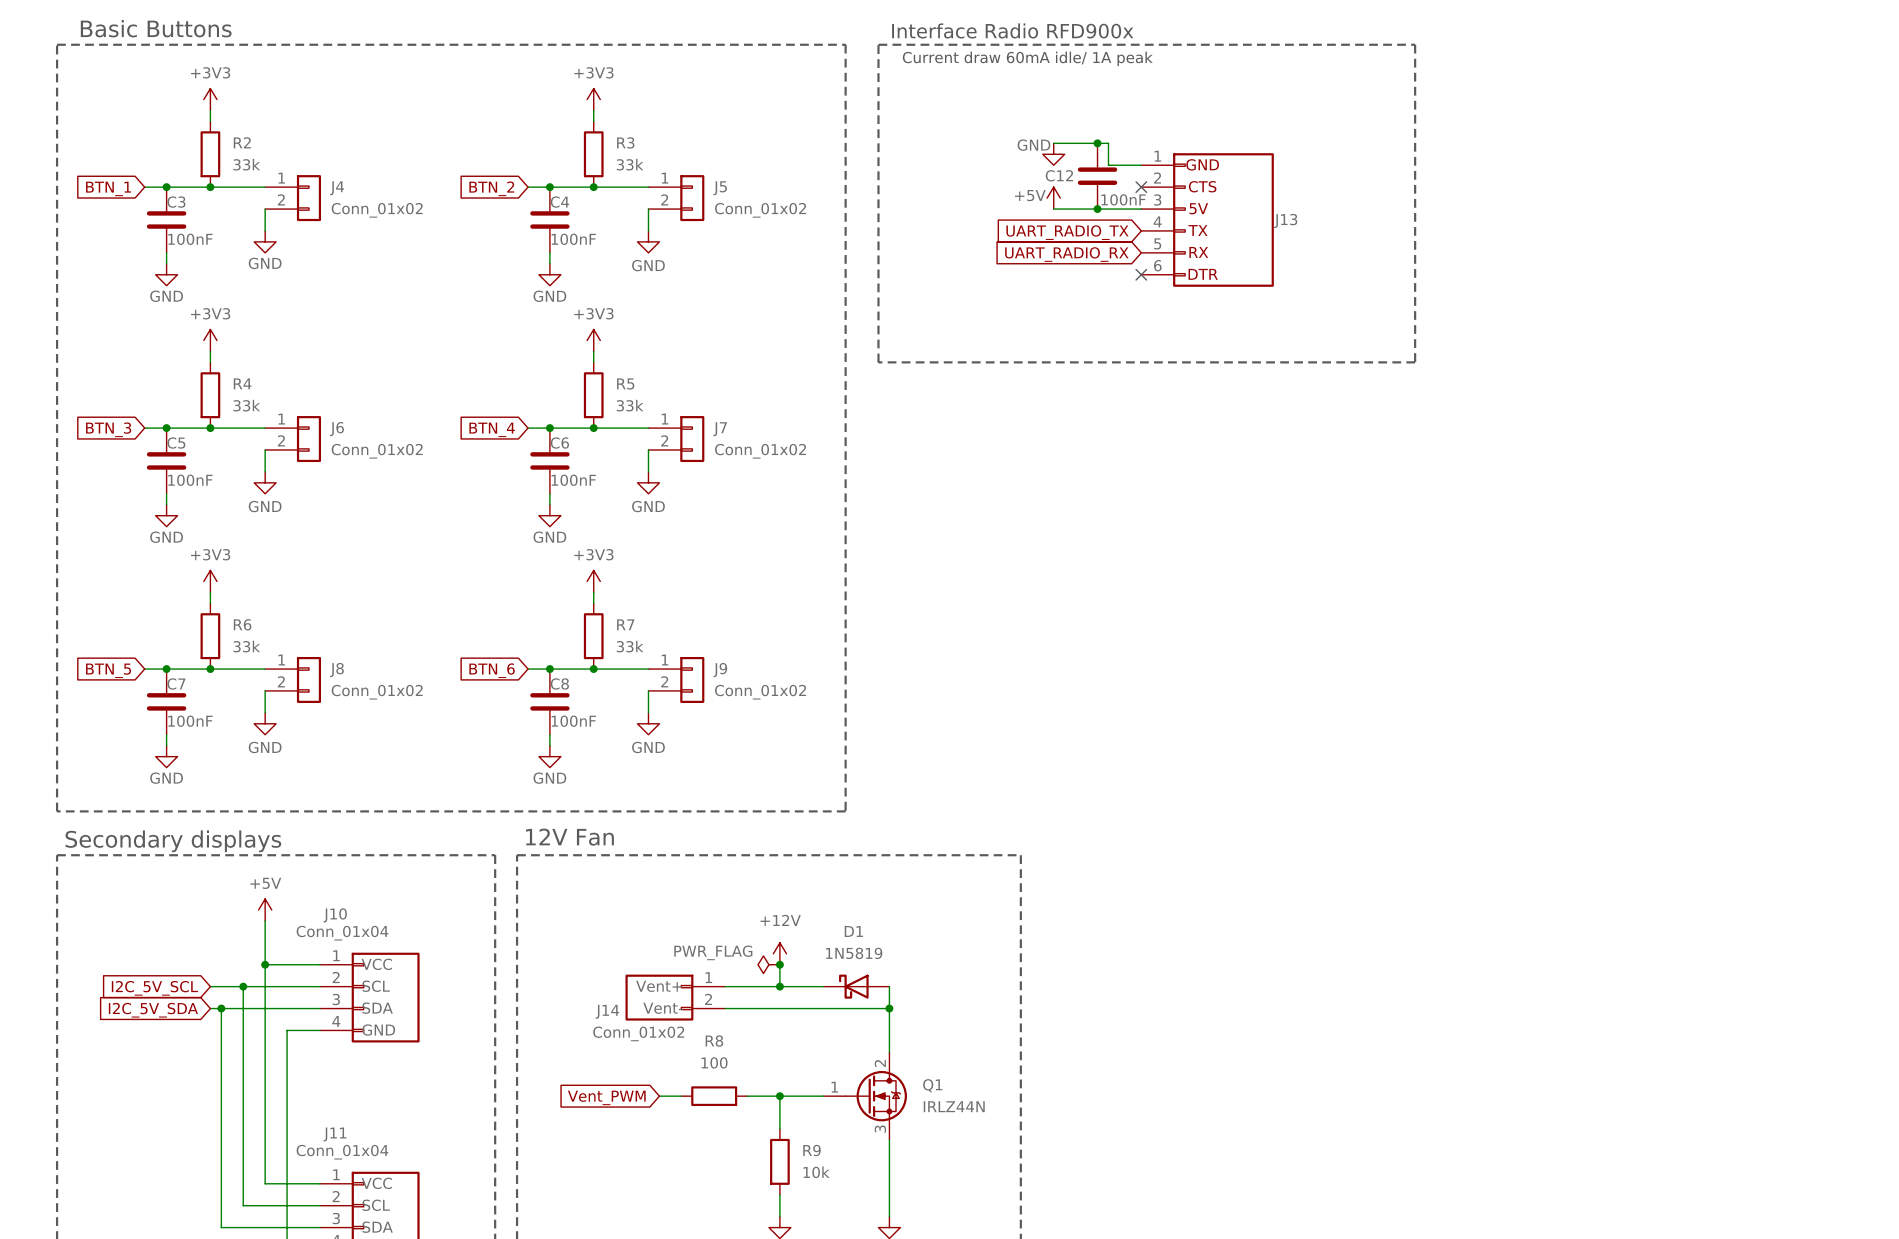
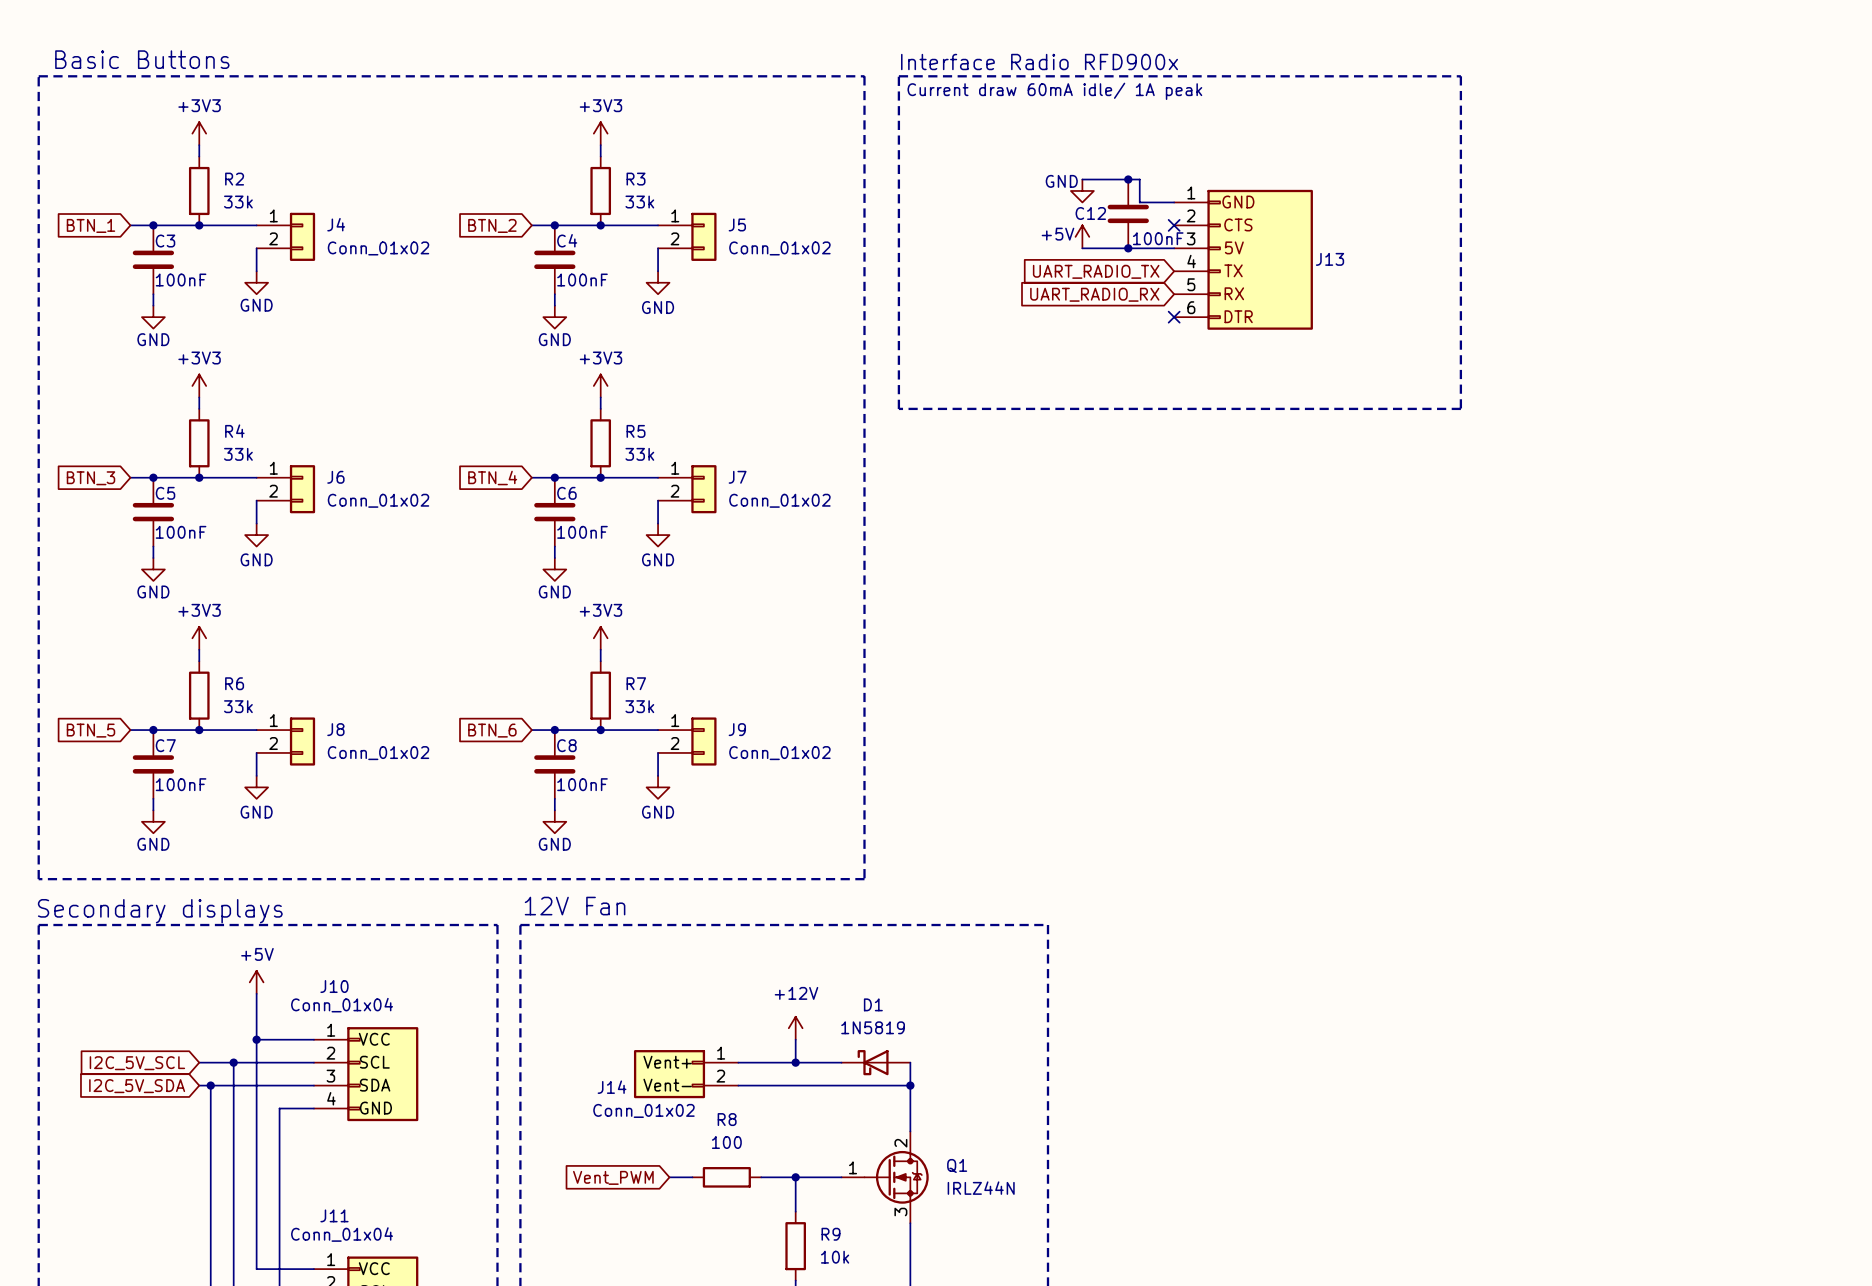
power symbol: PWR_FLAG (768, 964) -> none
junction: (779, 964) -> none

